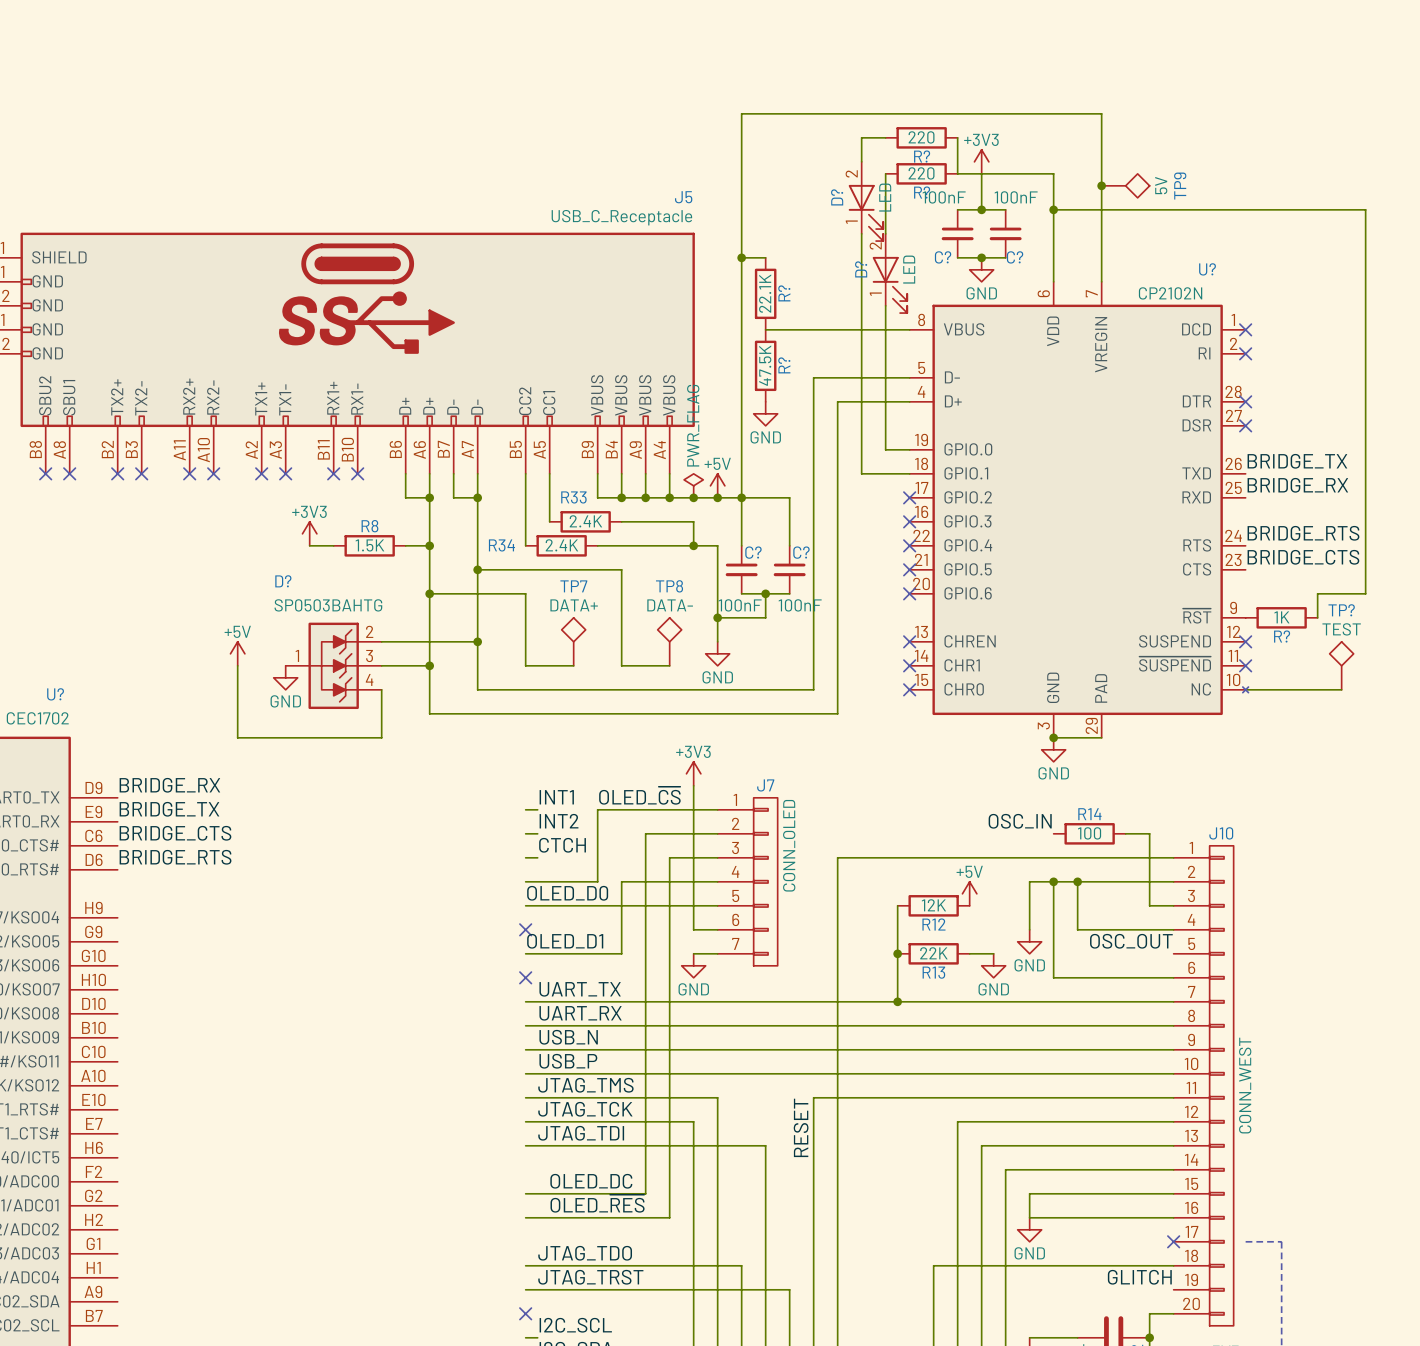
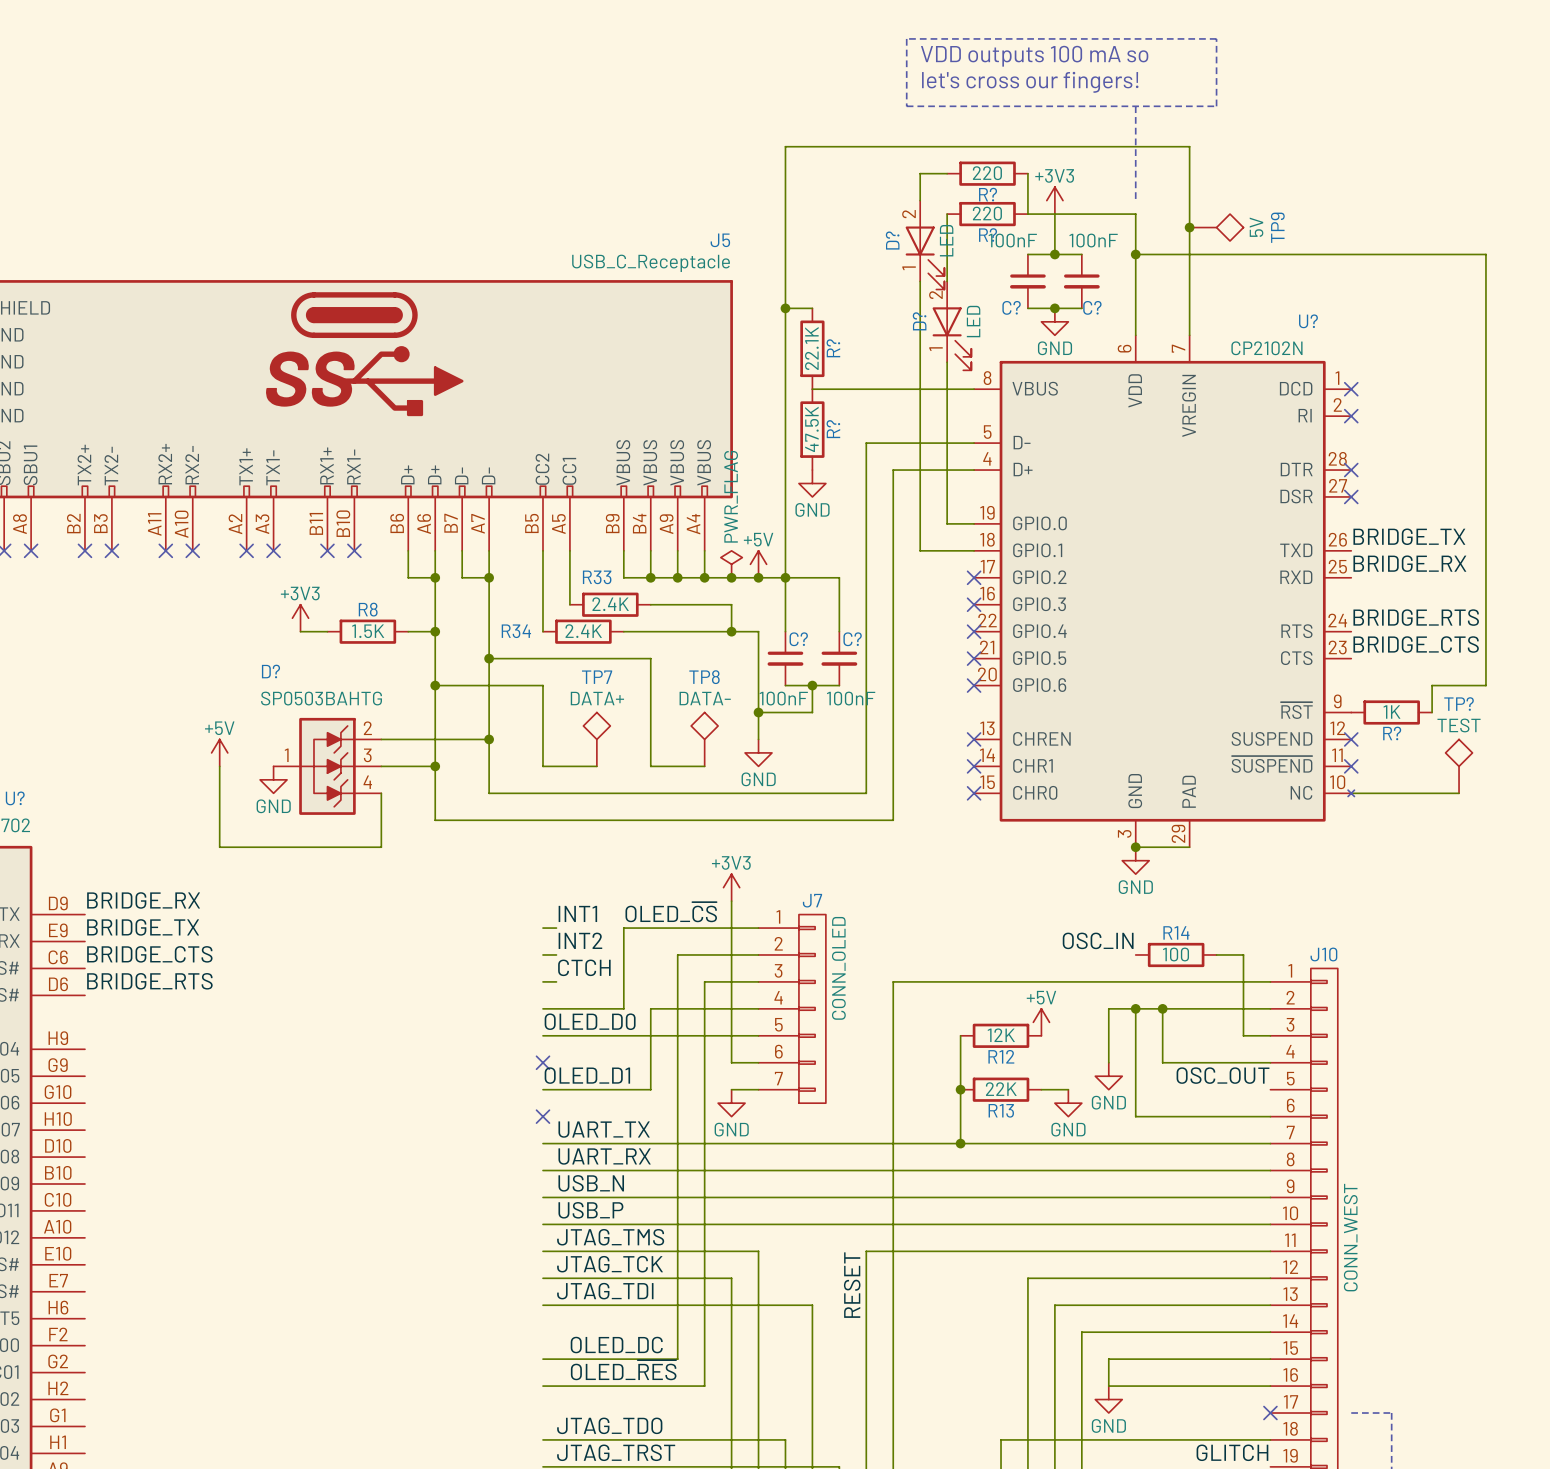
line: none -> (906, 38) (906, 106) (1216, 106) (1216, 38) (906, 38)
text: none -> VDD outputs 100 mA so (1034, 56)
text: none -> let's cross our fingers! (1030, 82)
line: none -> (1135, 106) (1135, 200)

